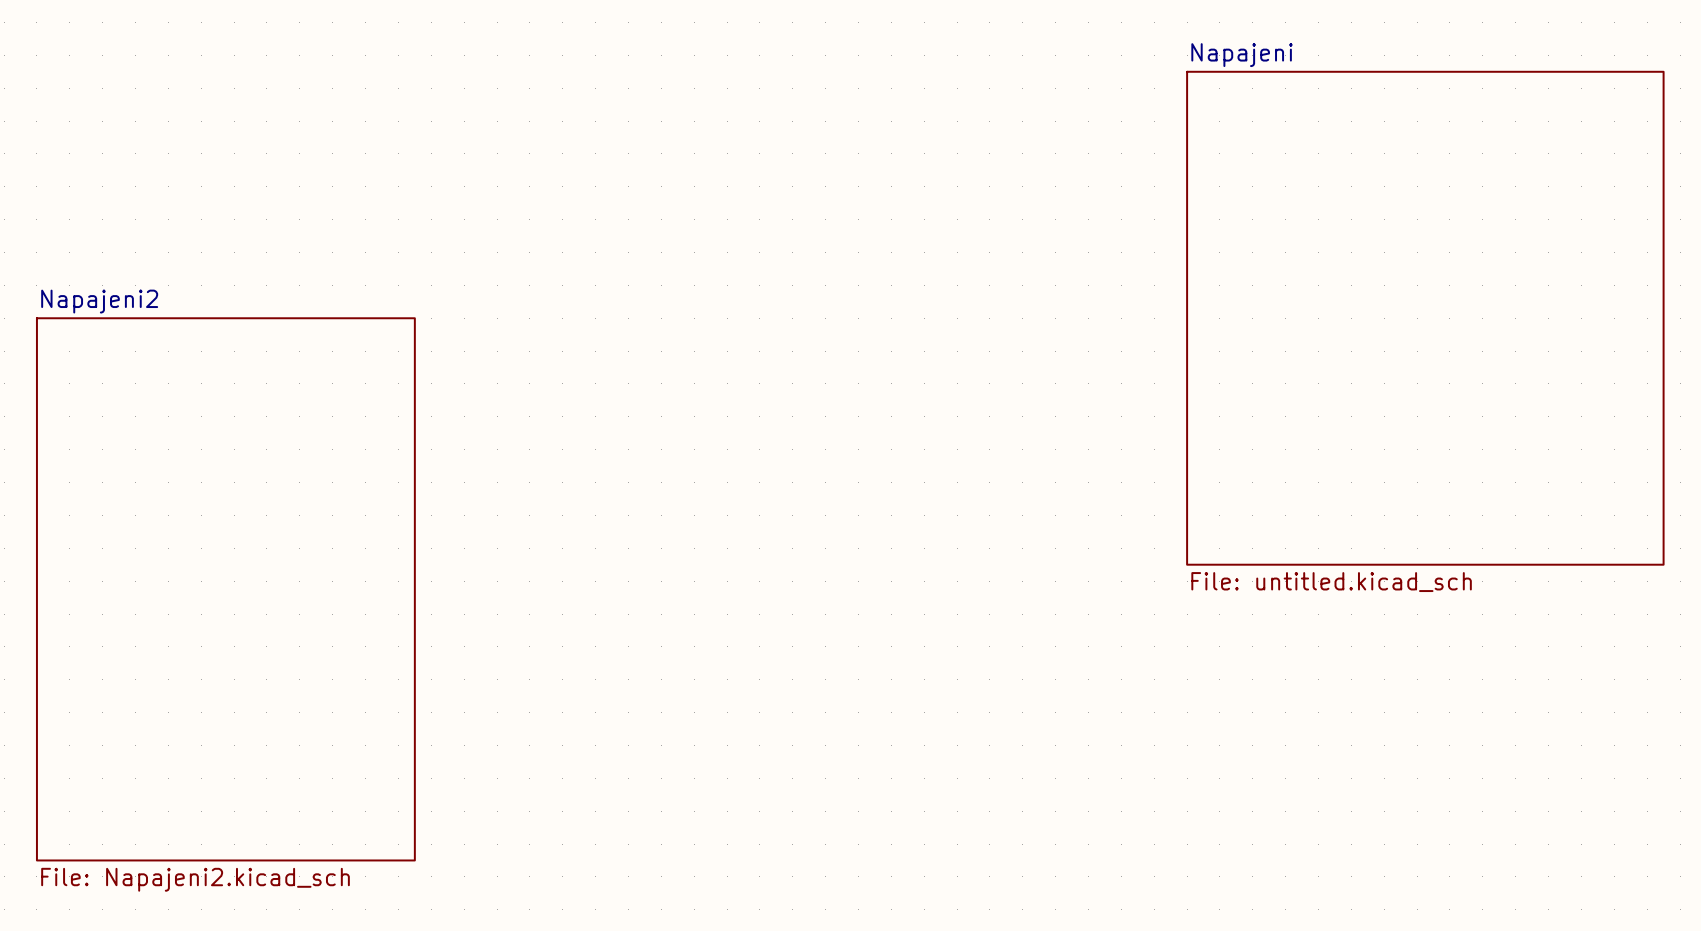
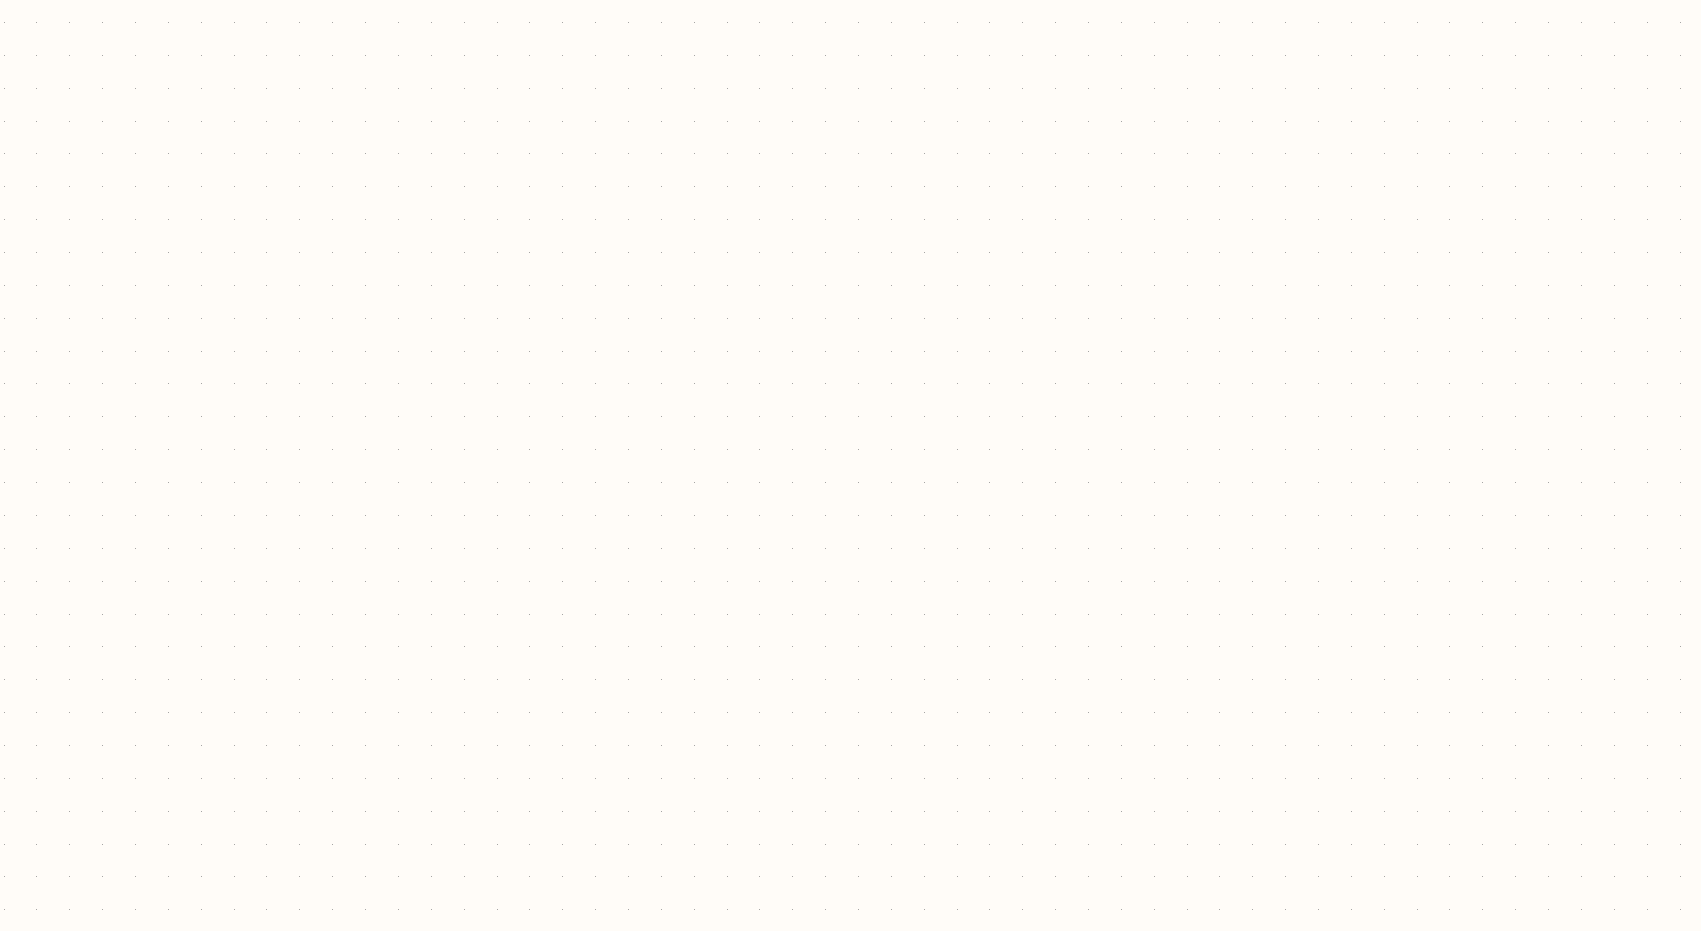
sheet Napajeni: File: untitled.kicad_sch (1425, 318) -> none
sheet Napajeni2: File: Napajeni2.kicad_sch (225, 589) -> none

